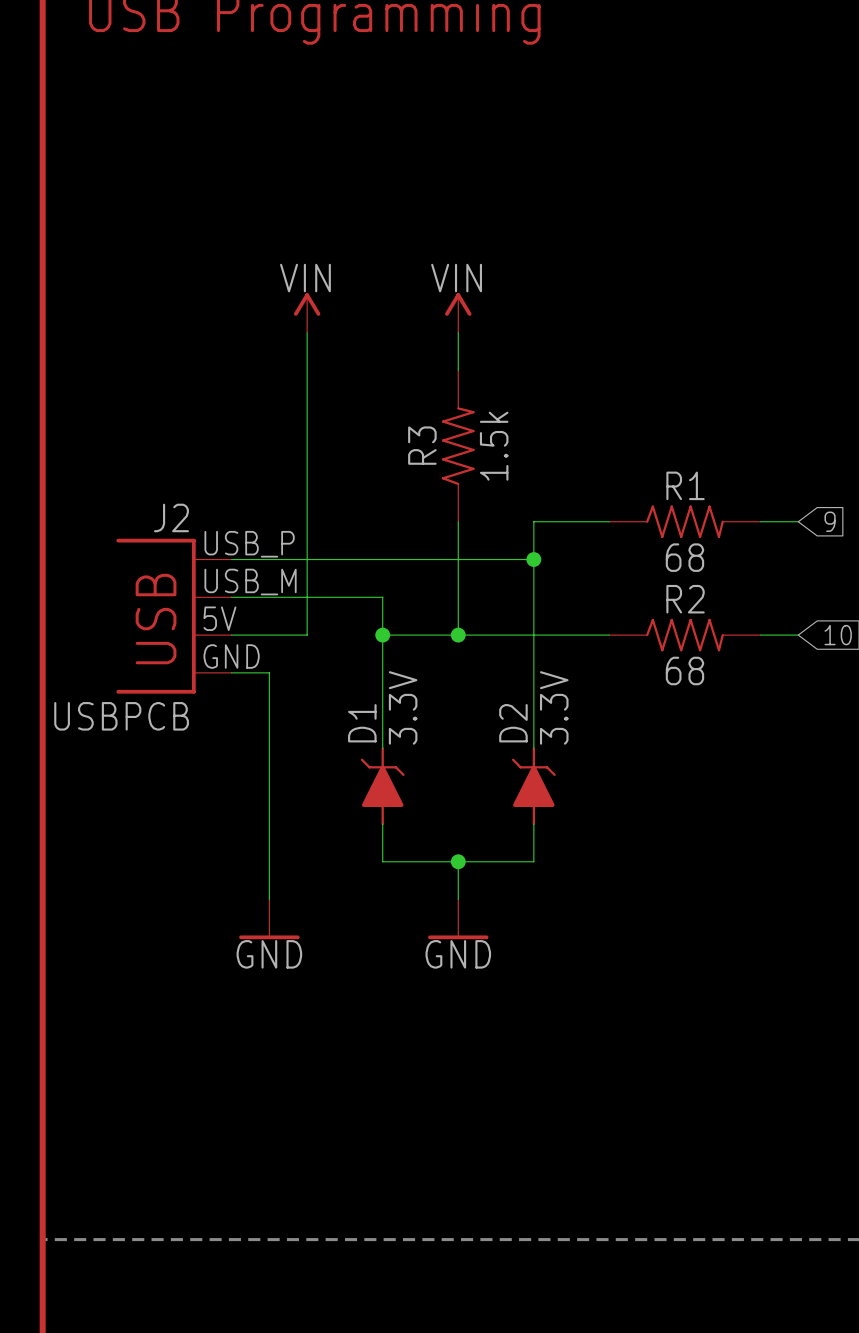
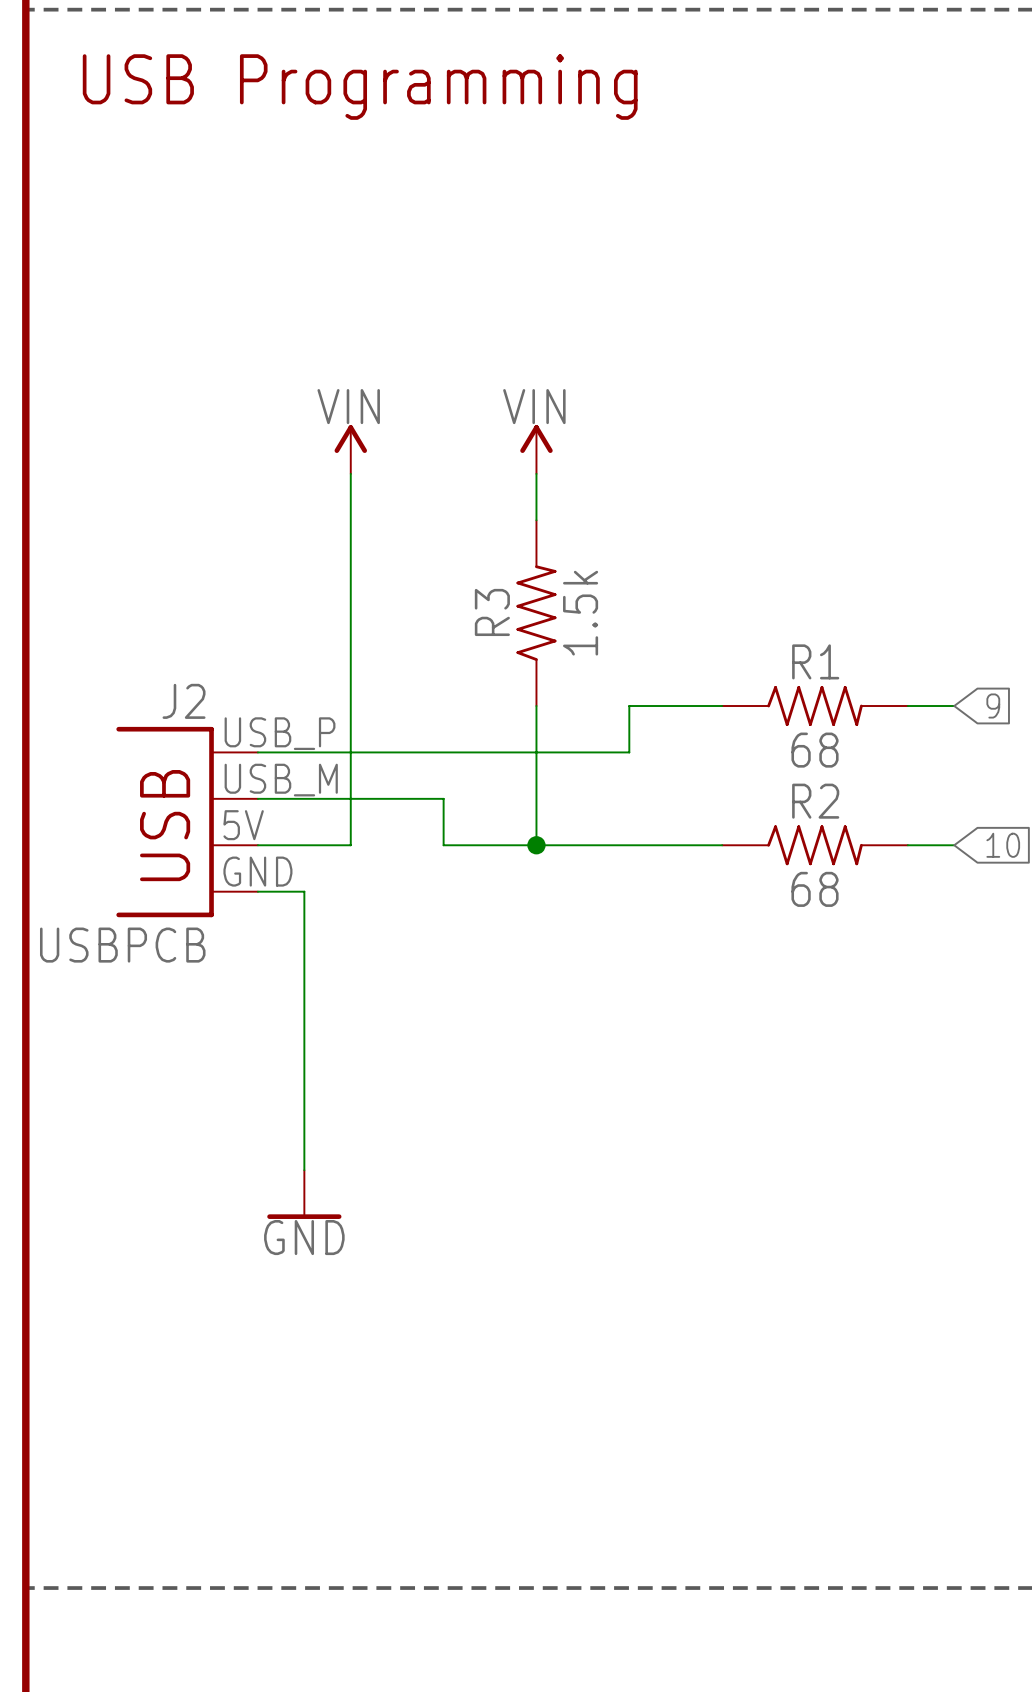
wire: (533, 559) (533, 748) -> none
junction: (533, 559) -> none
wire: (382, 635) (382, 748) -> none
junction: (382, 635) -> none
D1: 3.3V (382, 786) -> none
D2: 3.3V (533, 786) -> none
wire: (382, 823) (382, 861) (533, 861) (533, 823) -> none
wire: (458, 861) (458, 899) -> none
junction: (458, 861) -> none
power symbol: GND (458, 919) -> none

